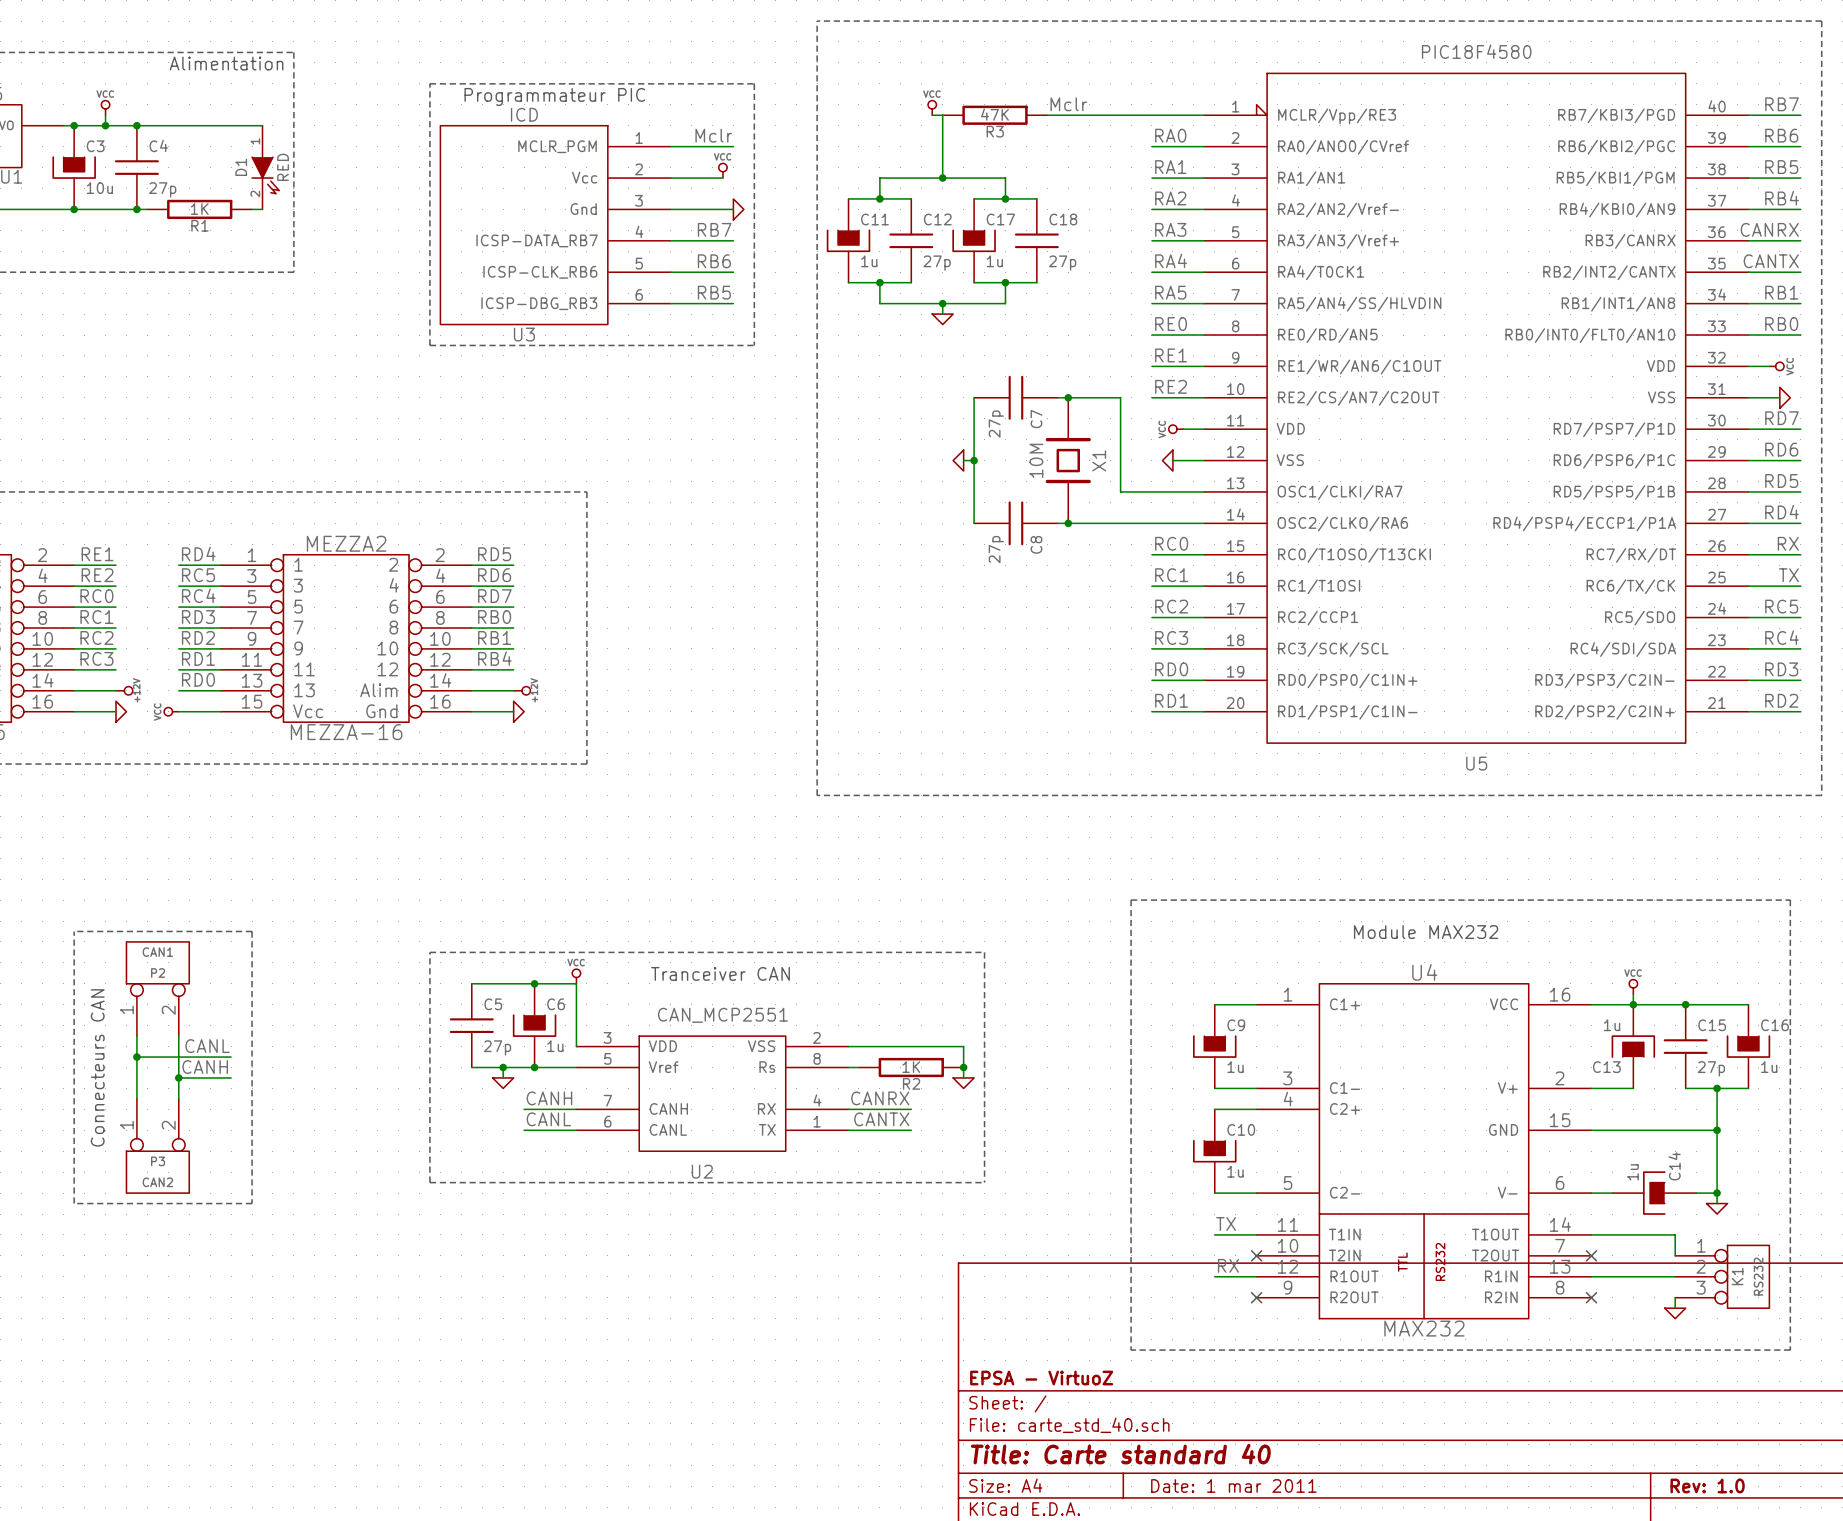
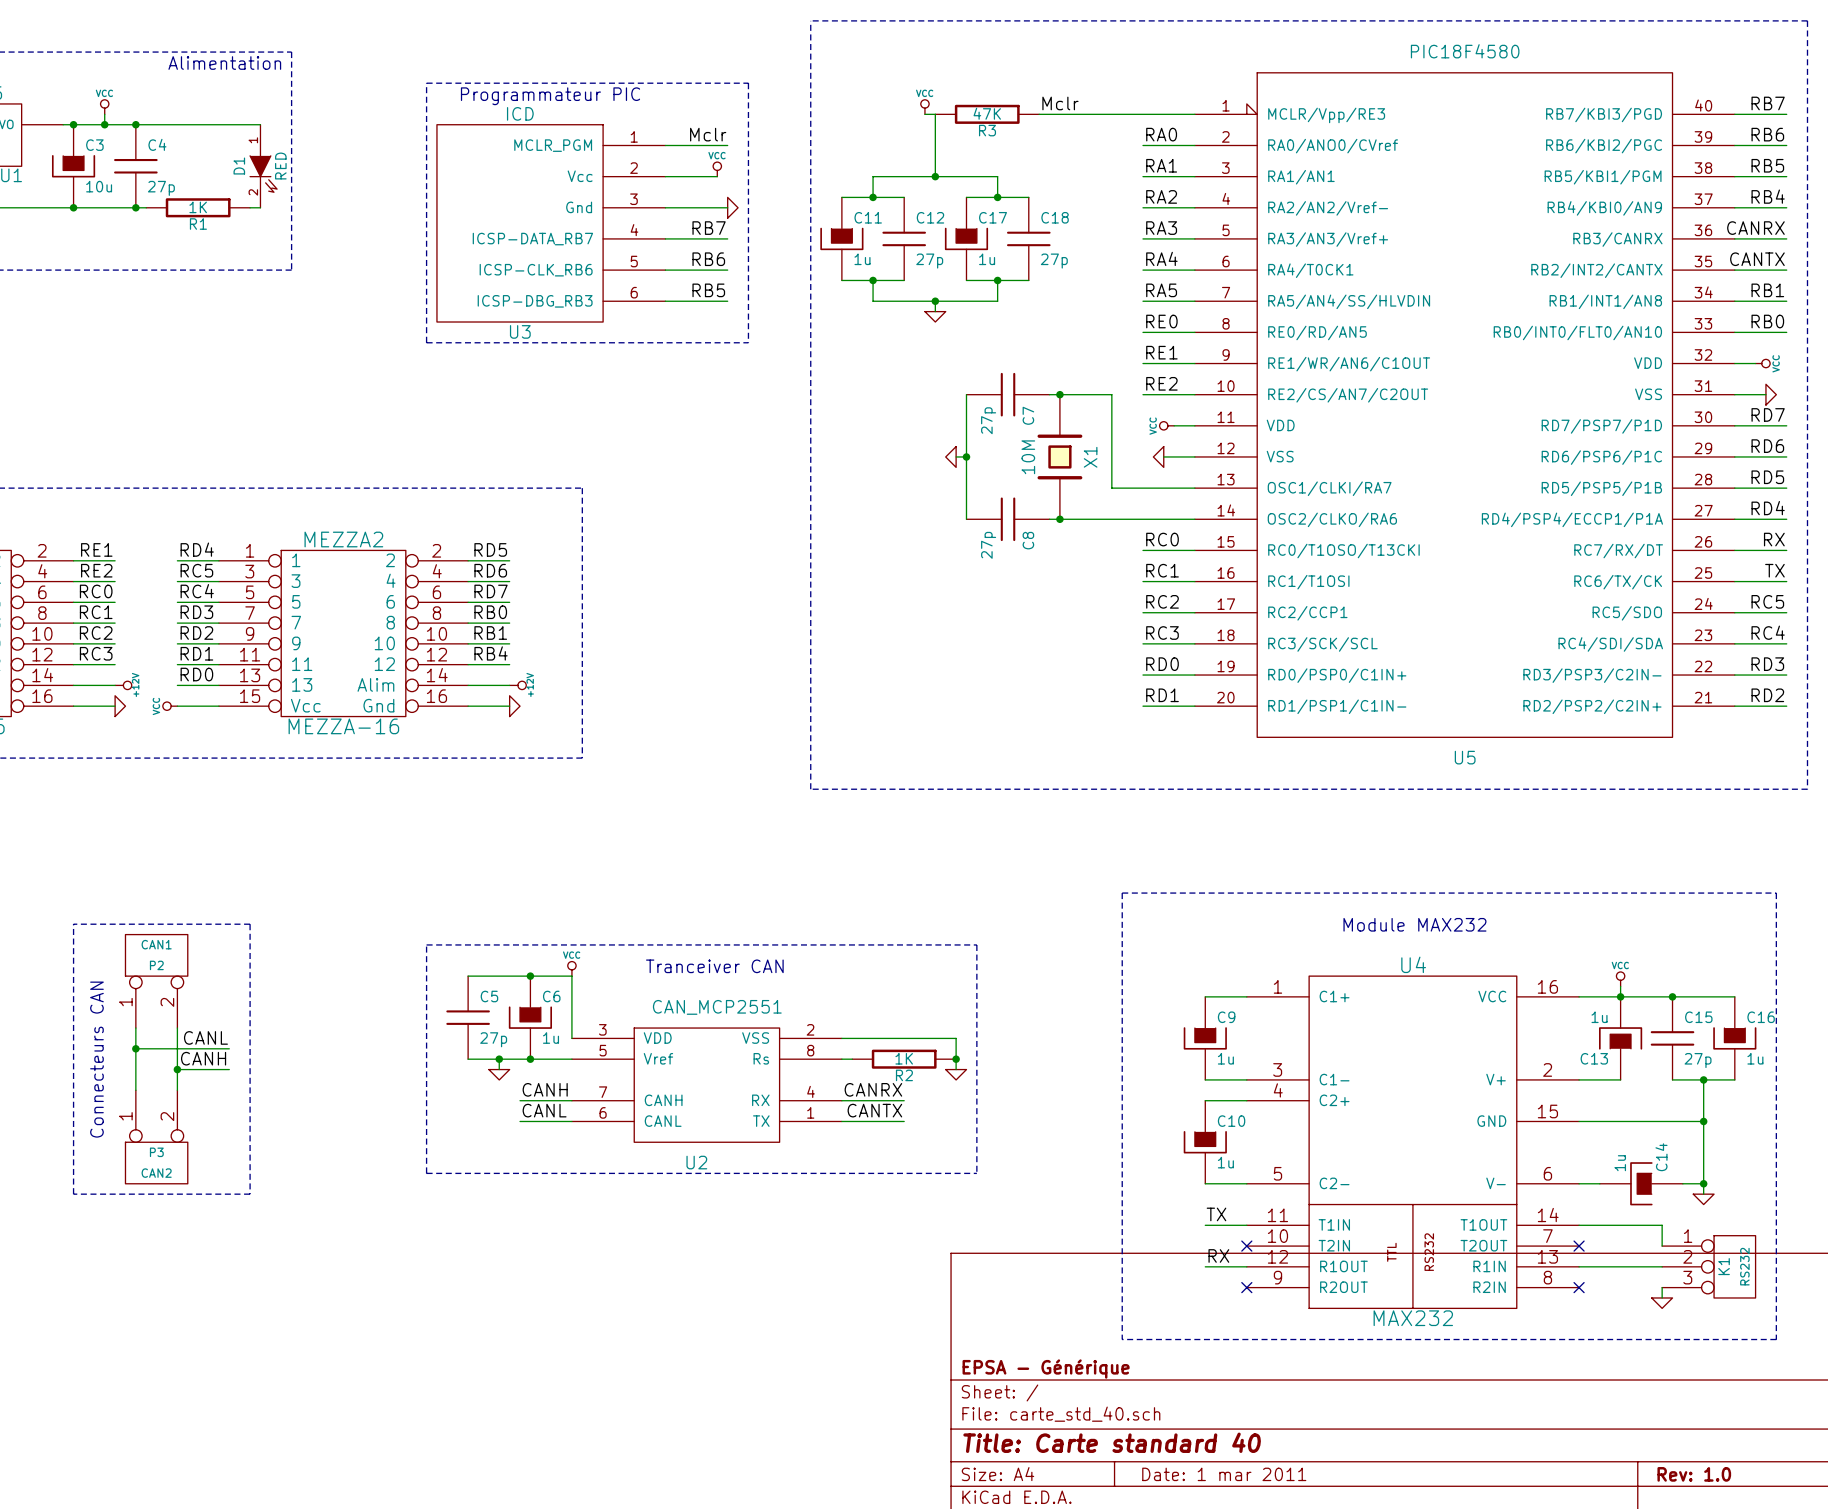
title block: EPSA - VirtuoZ (1041, 1378) -> EPSA - Générique (1046, 1369)

